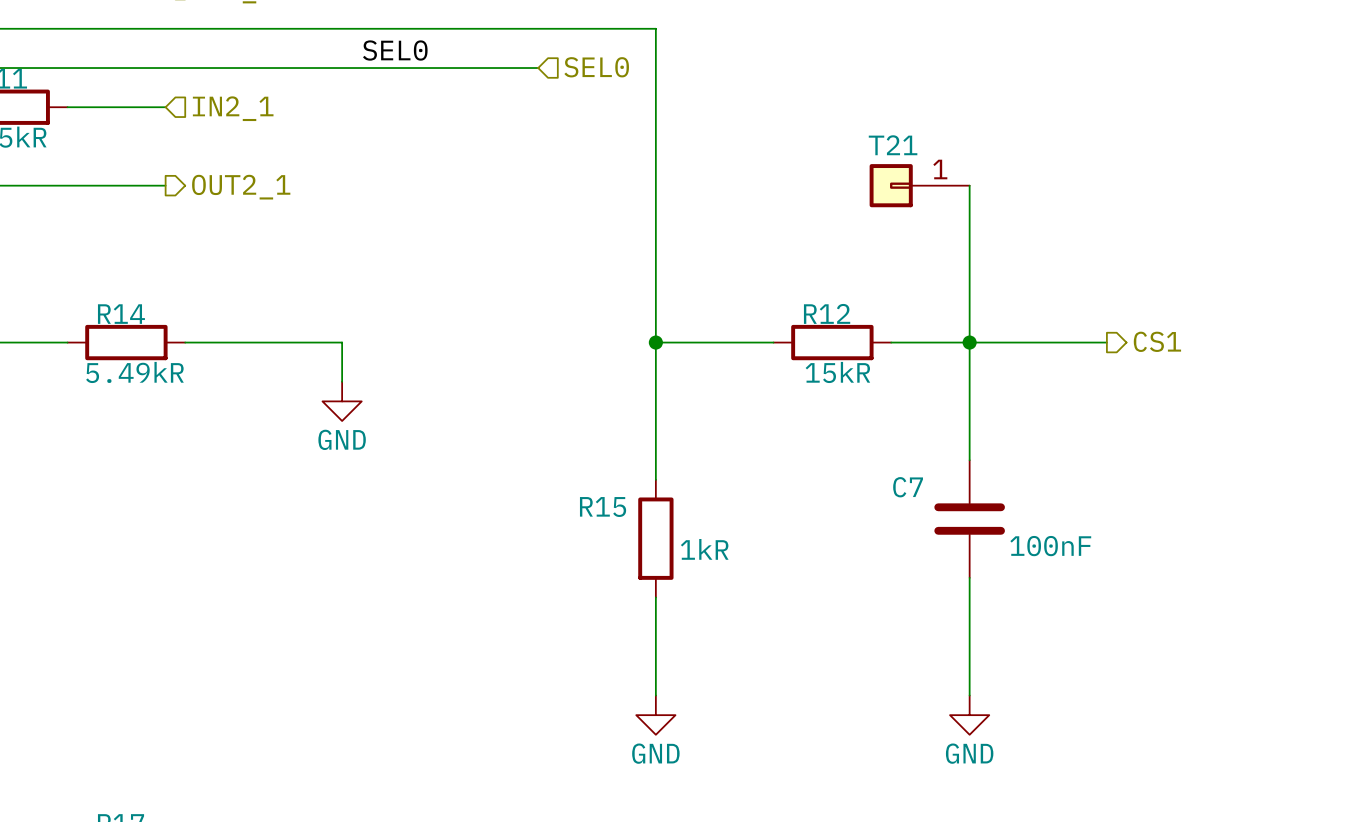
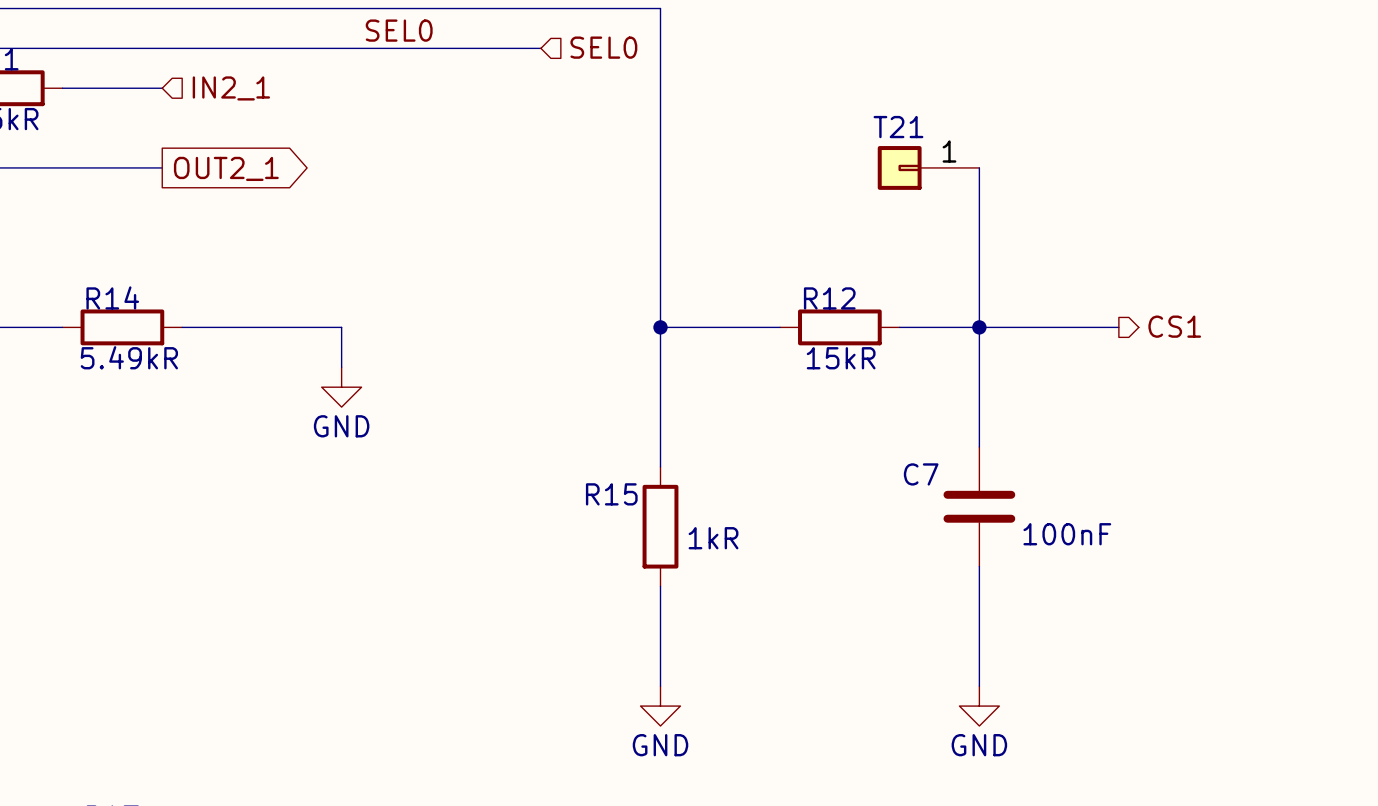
global label: none -> OUT2_1 (226, 168)
hierarchical label: OUT2_1 (241, 187) -> none

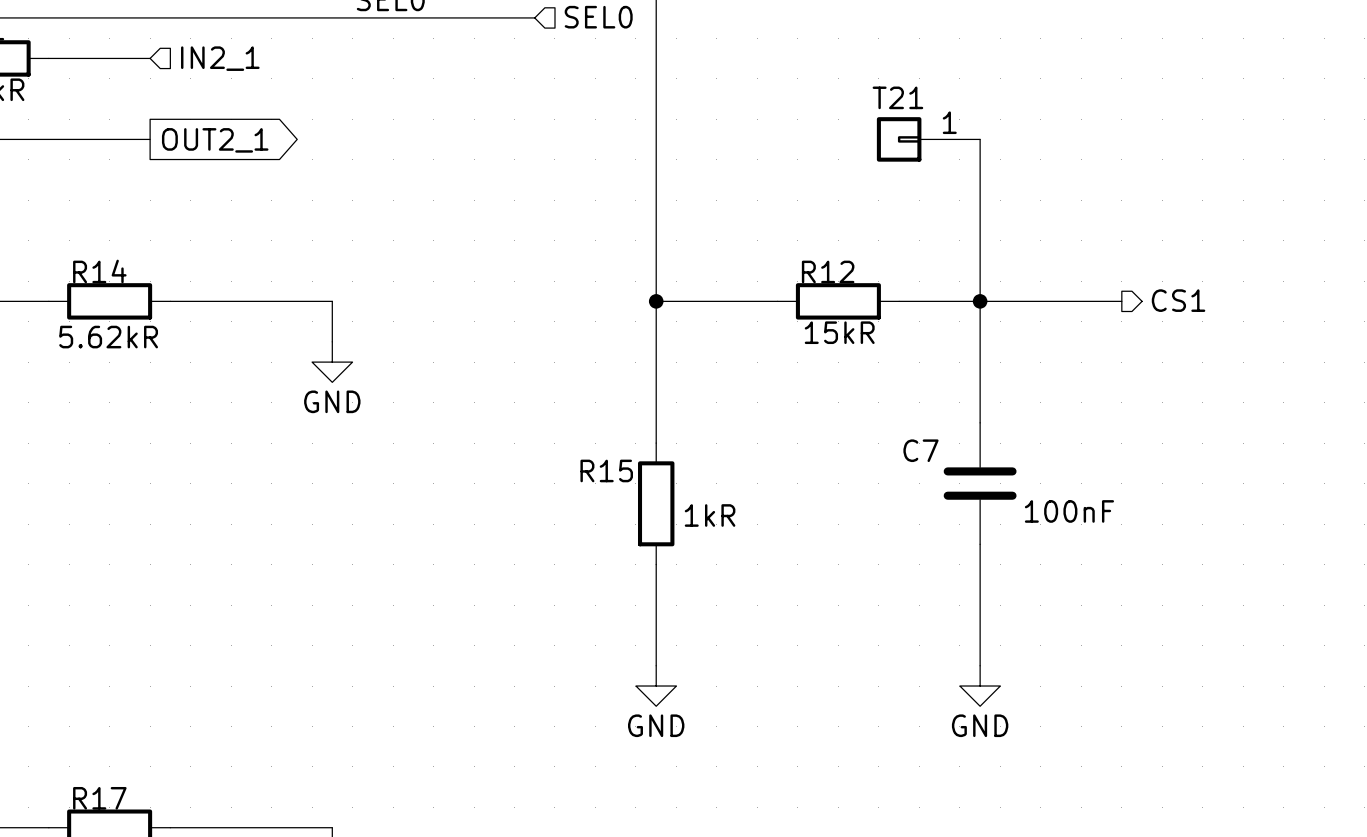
R14 text: 5.49kR (129, 357) -> none
R14 value: none -> 5.62kR (108, 337)

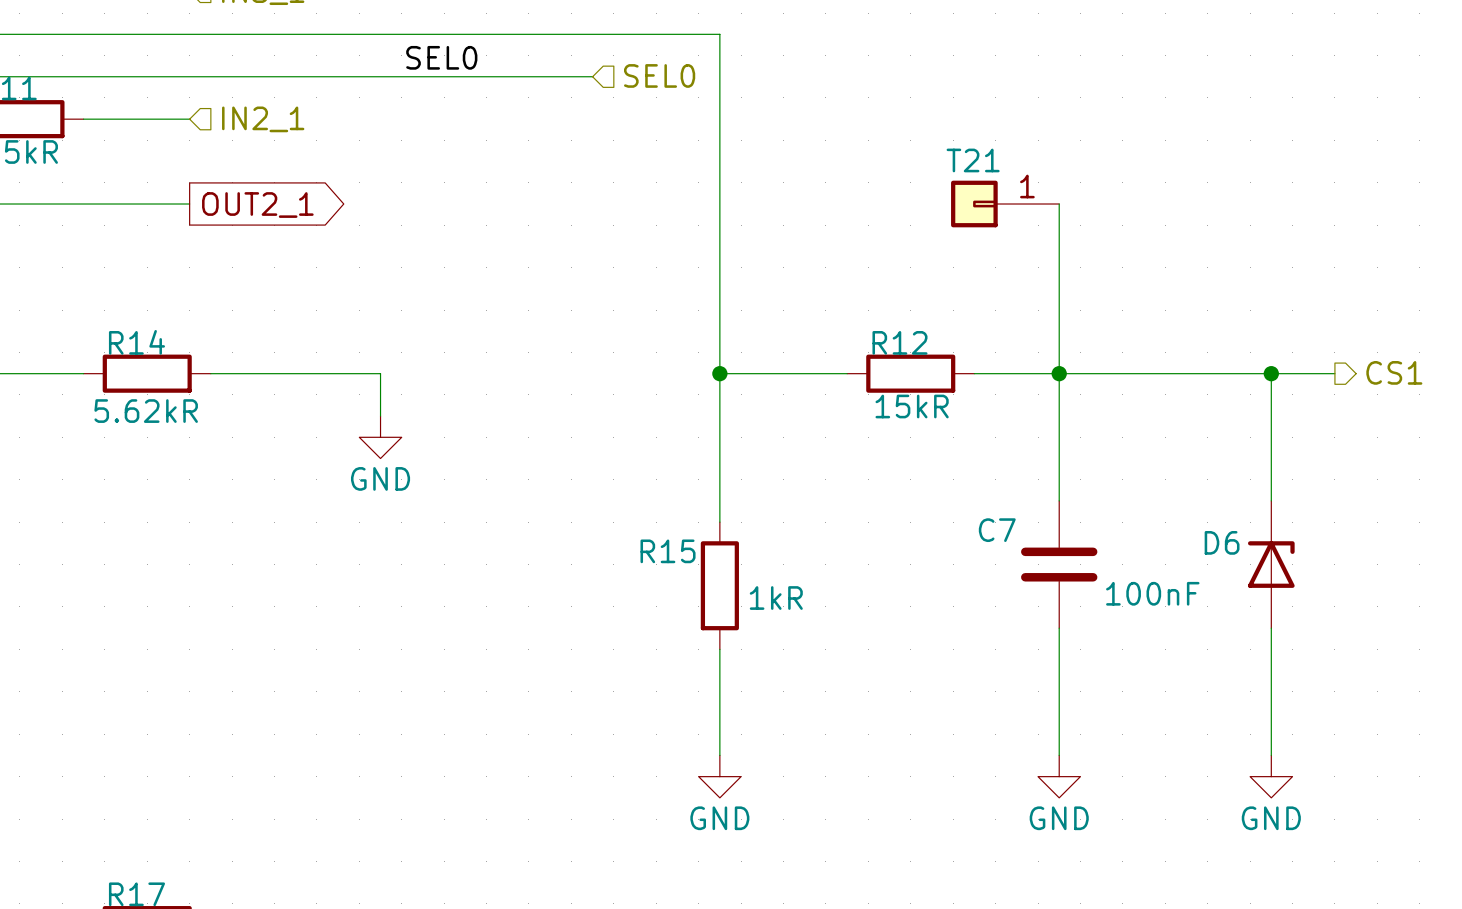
hierarchical label position: CS1 (1178, 300) -> CS1 (1394, 372)
wire: none -> (1207, 373) (1334, 373)
wire: none -> (1271, 373) (1271, 500)
junction: none -> (1271, 373)
D6: none -> (1271, 564)
wire: none -> (1271, 628) (1271, 755)
power symbol: none -> GND (1271, 776)

